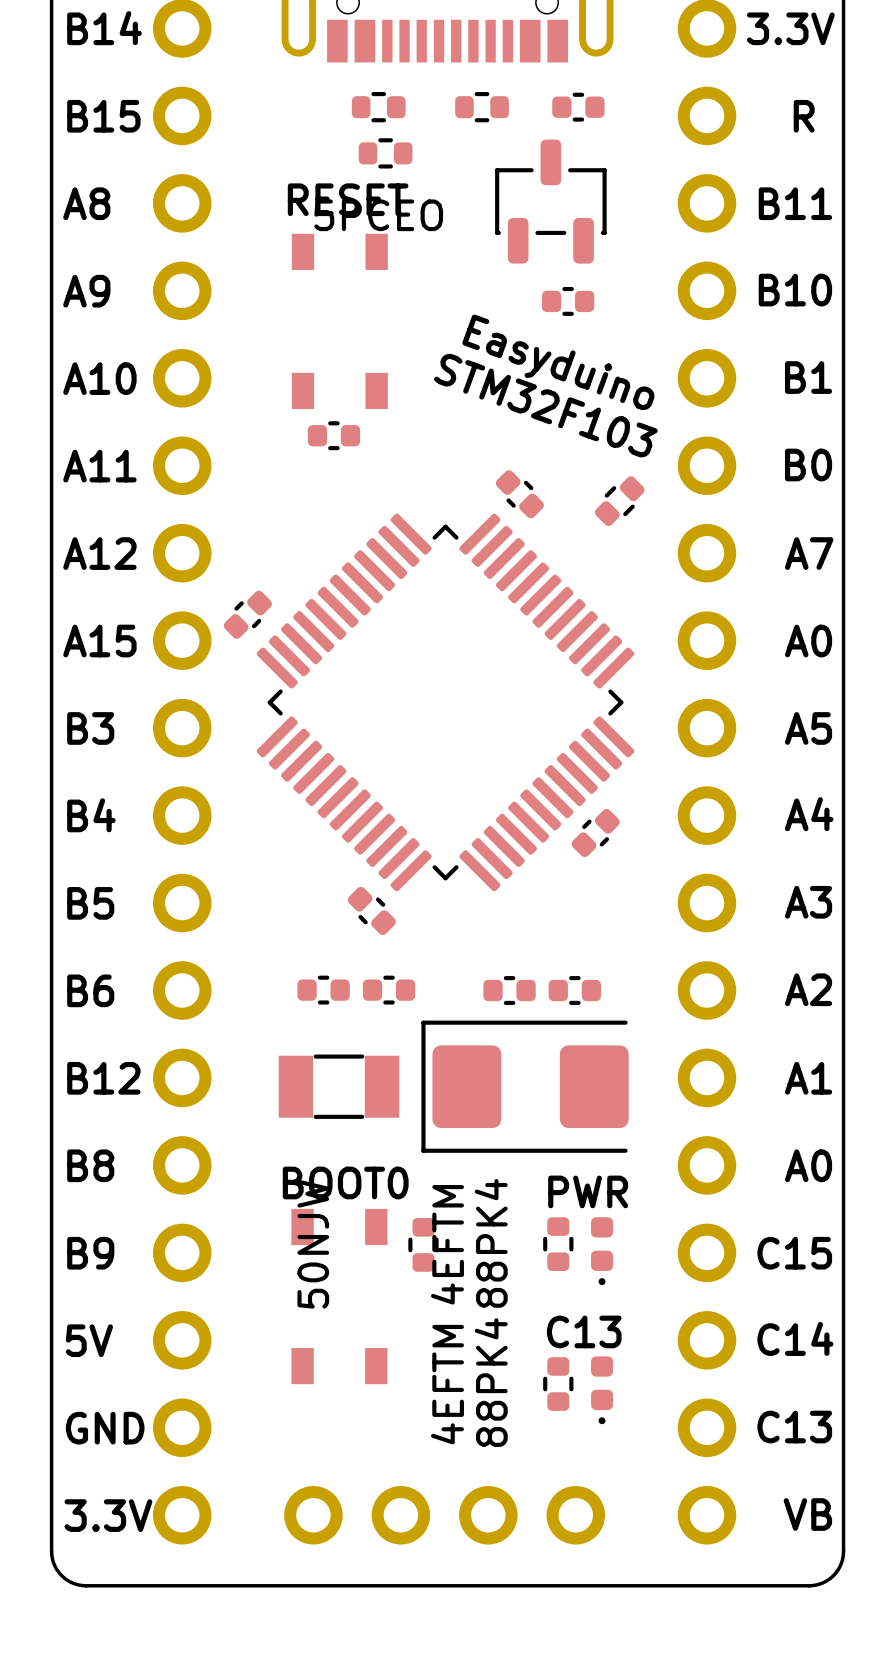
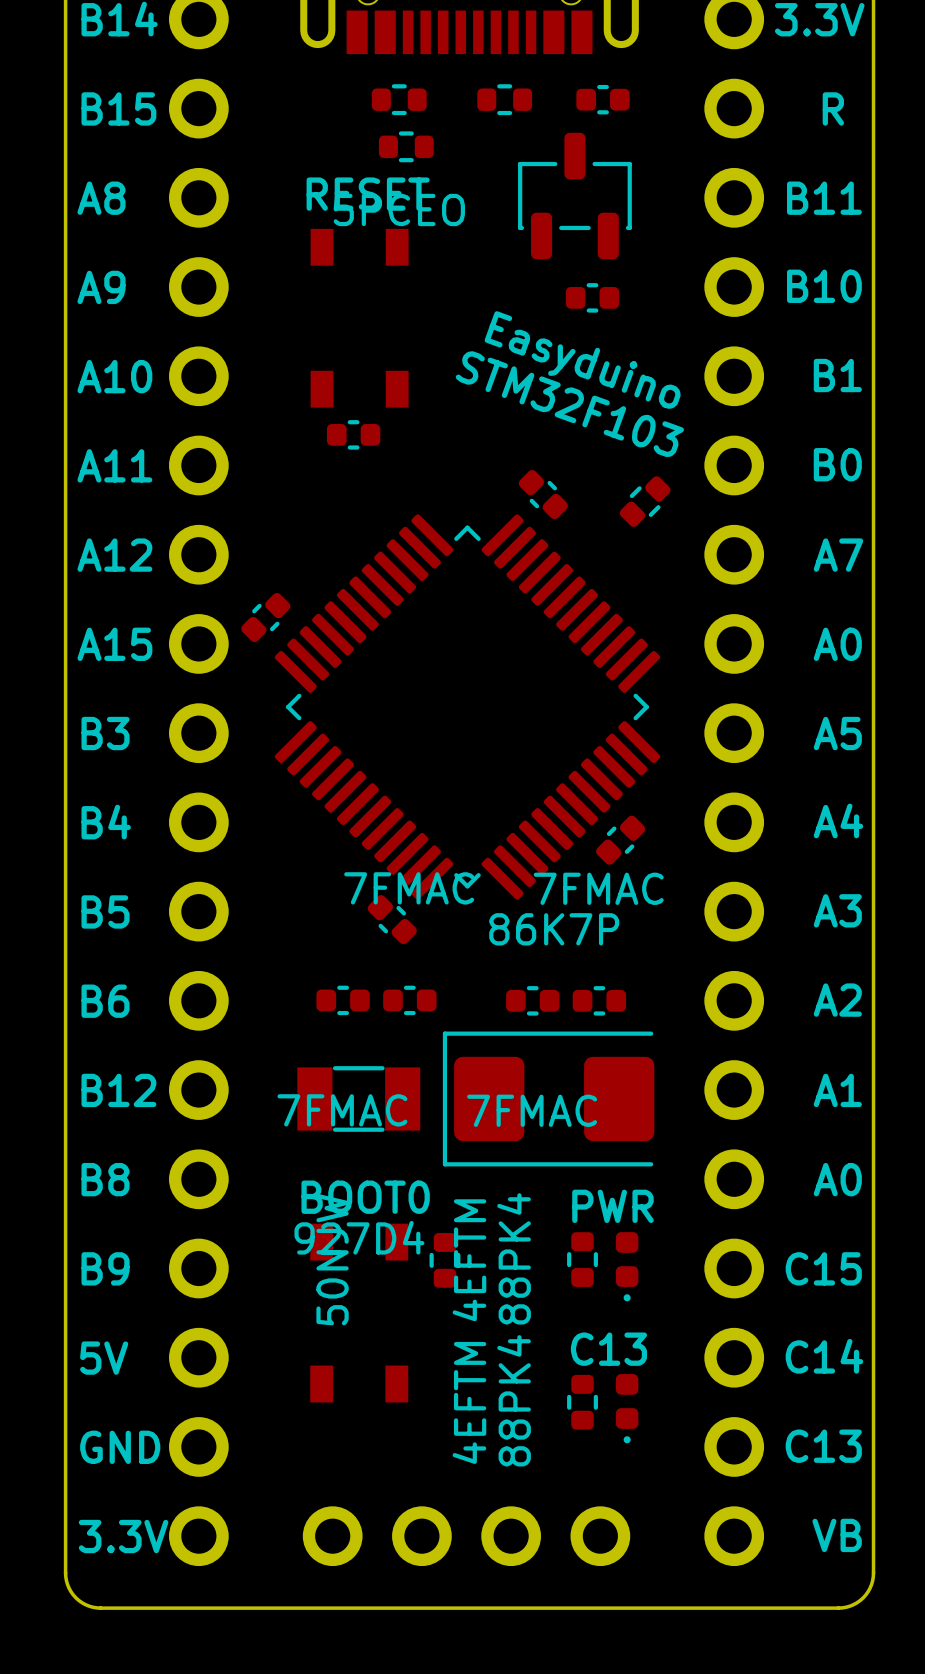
part text: none -> 7FMAC (409, 888)
part text: none -> 7FMAC (598, 888)
part text: none -> 86K7P (554, 929)
part text: none -> 7FMAC (342, 1110)
part text: none -> 7FMAC (532, 1110)
part text: none -> 927D4 (359, 1237)

